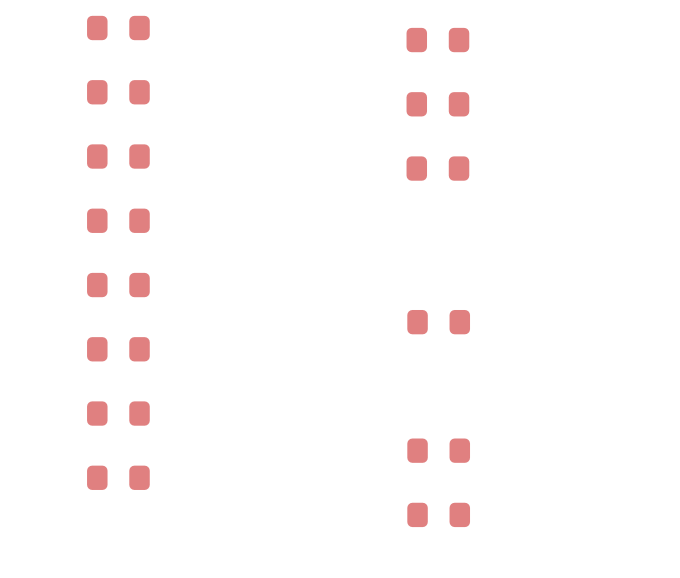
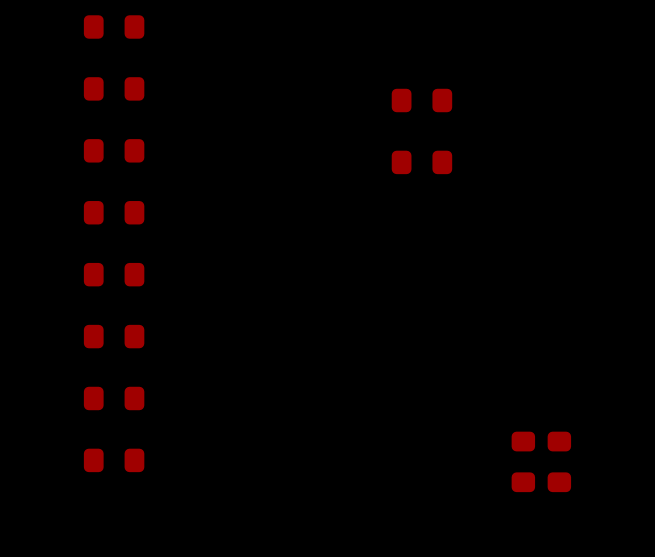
part: (437, 40) -> none
part: (438, 322) -> none
part: (438, 450) -> none
part: none -> (523, 461)
part: none -> (559, 461)
part: (438, 514) -> none

